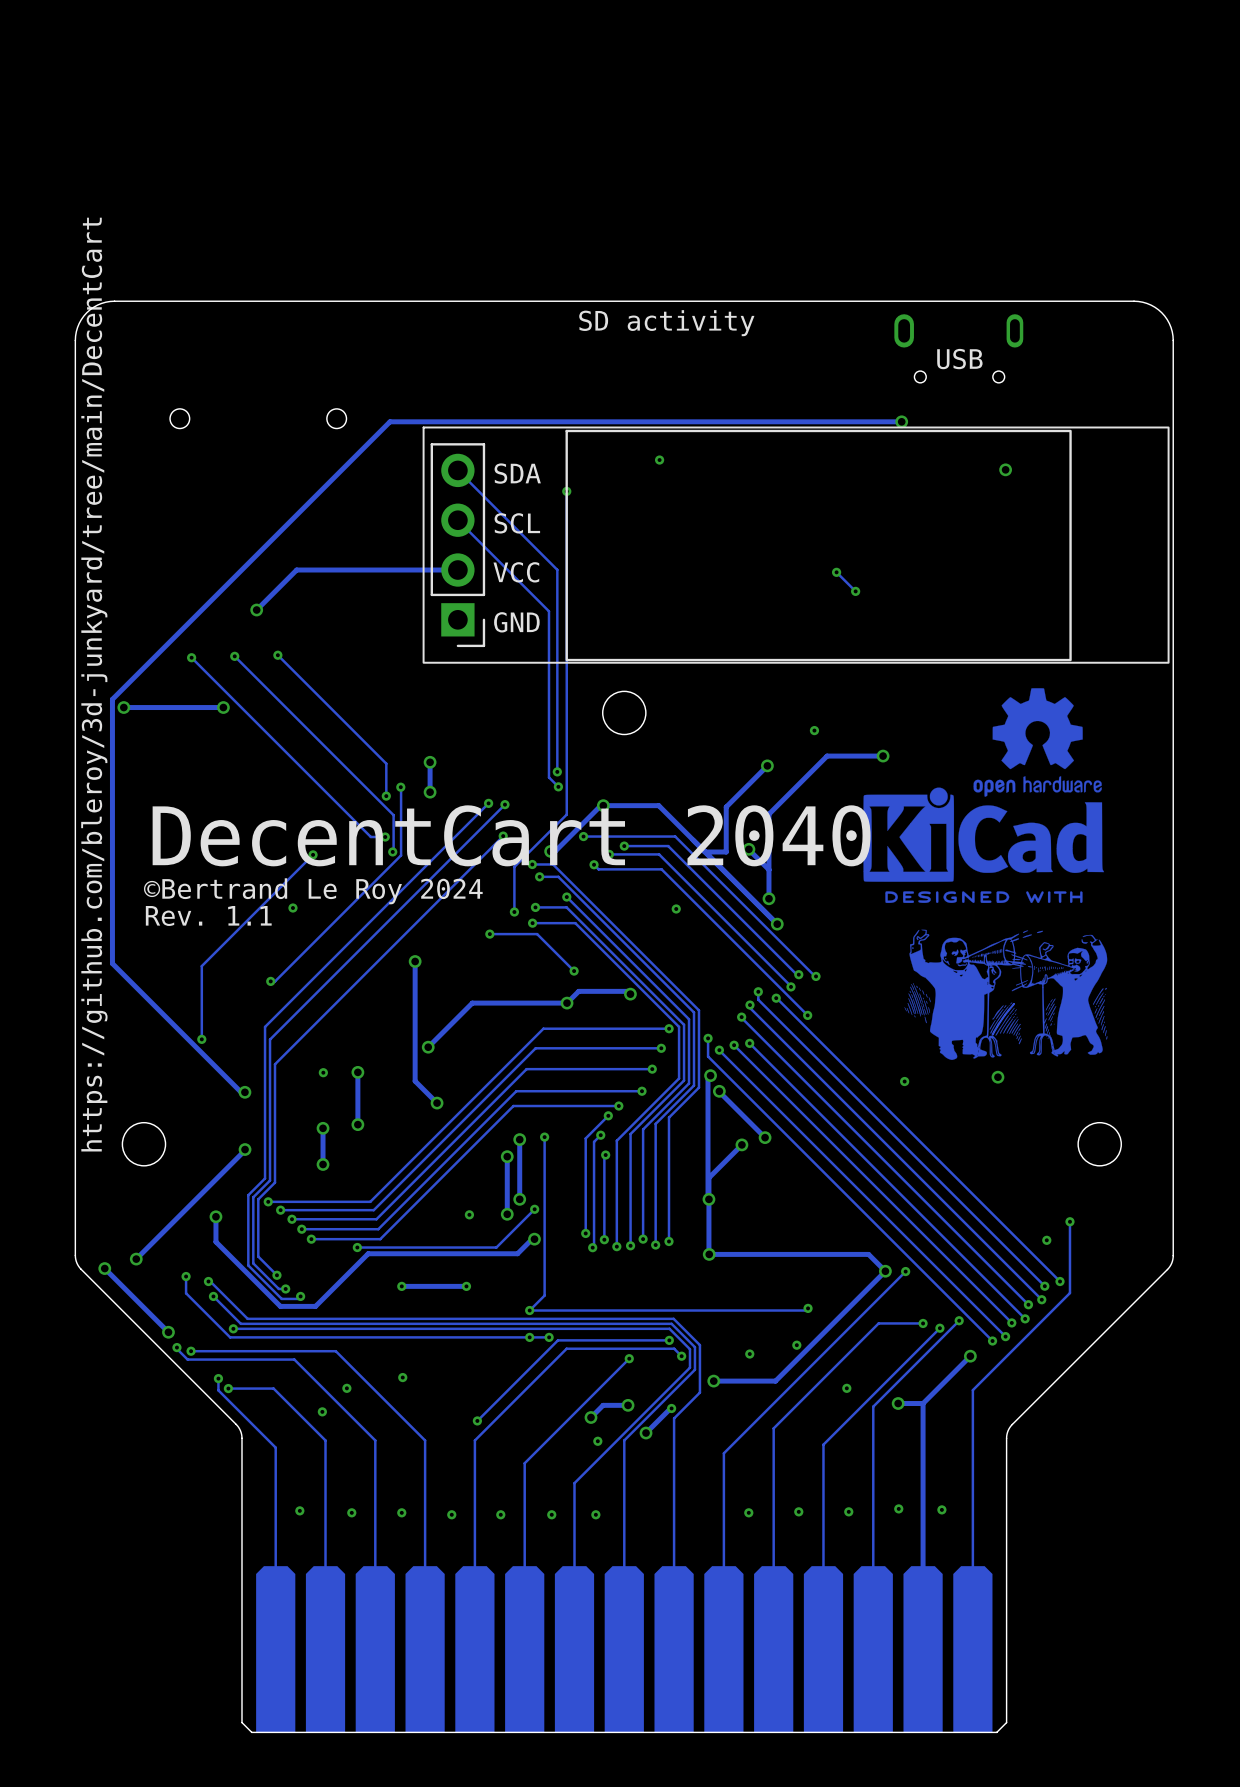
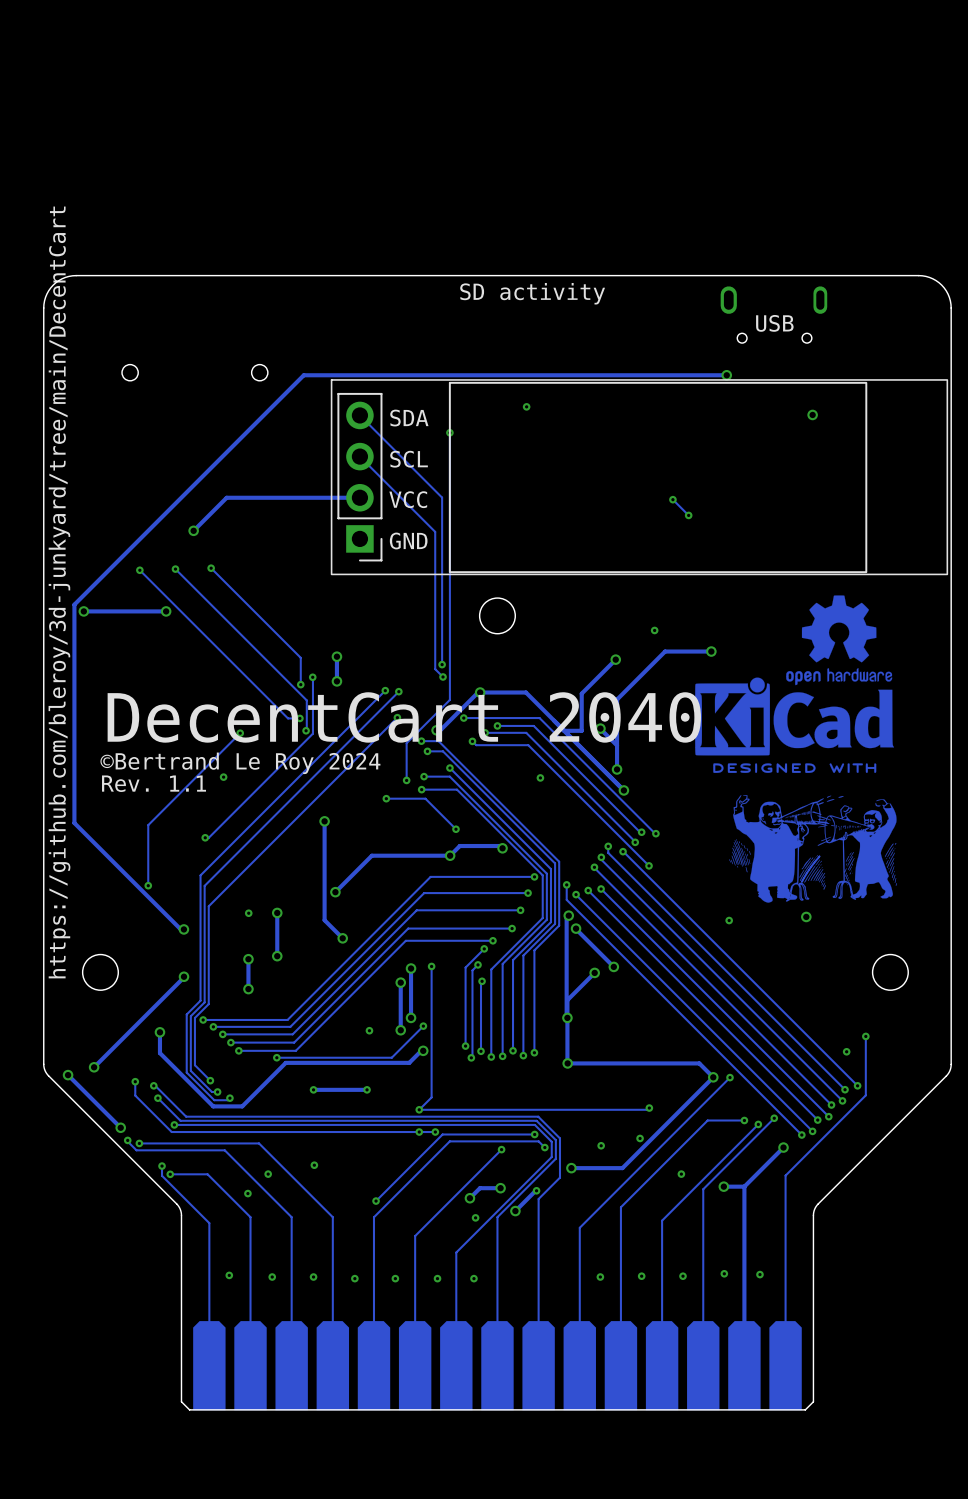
part: none -> (497, 1365)
part: (624, 1649) -> none
board edge: (1006, 1663) (1006, 1722) (996, 1732) (251, 1732) (241, 1722) (241, 1663) -> (813, 1401) (805, 1409) (189, 1409) (181, 1401)

